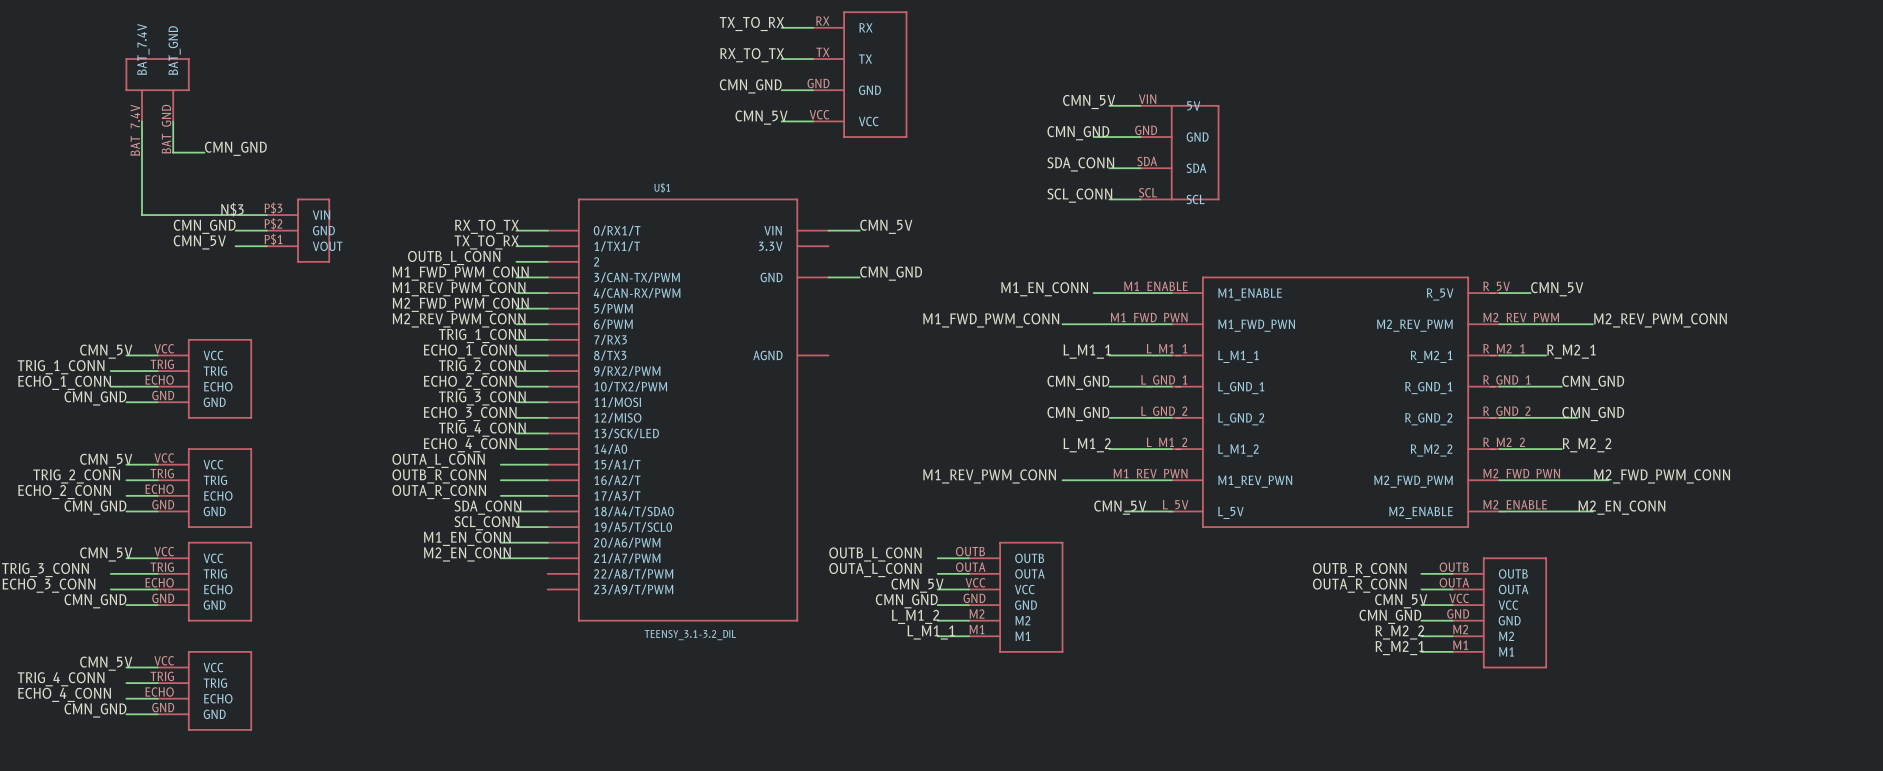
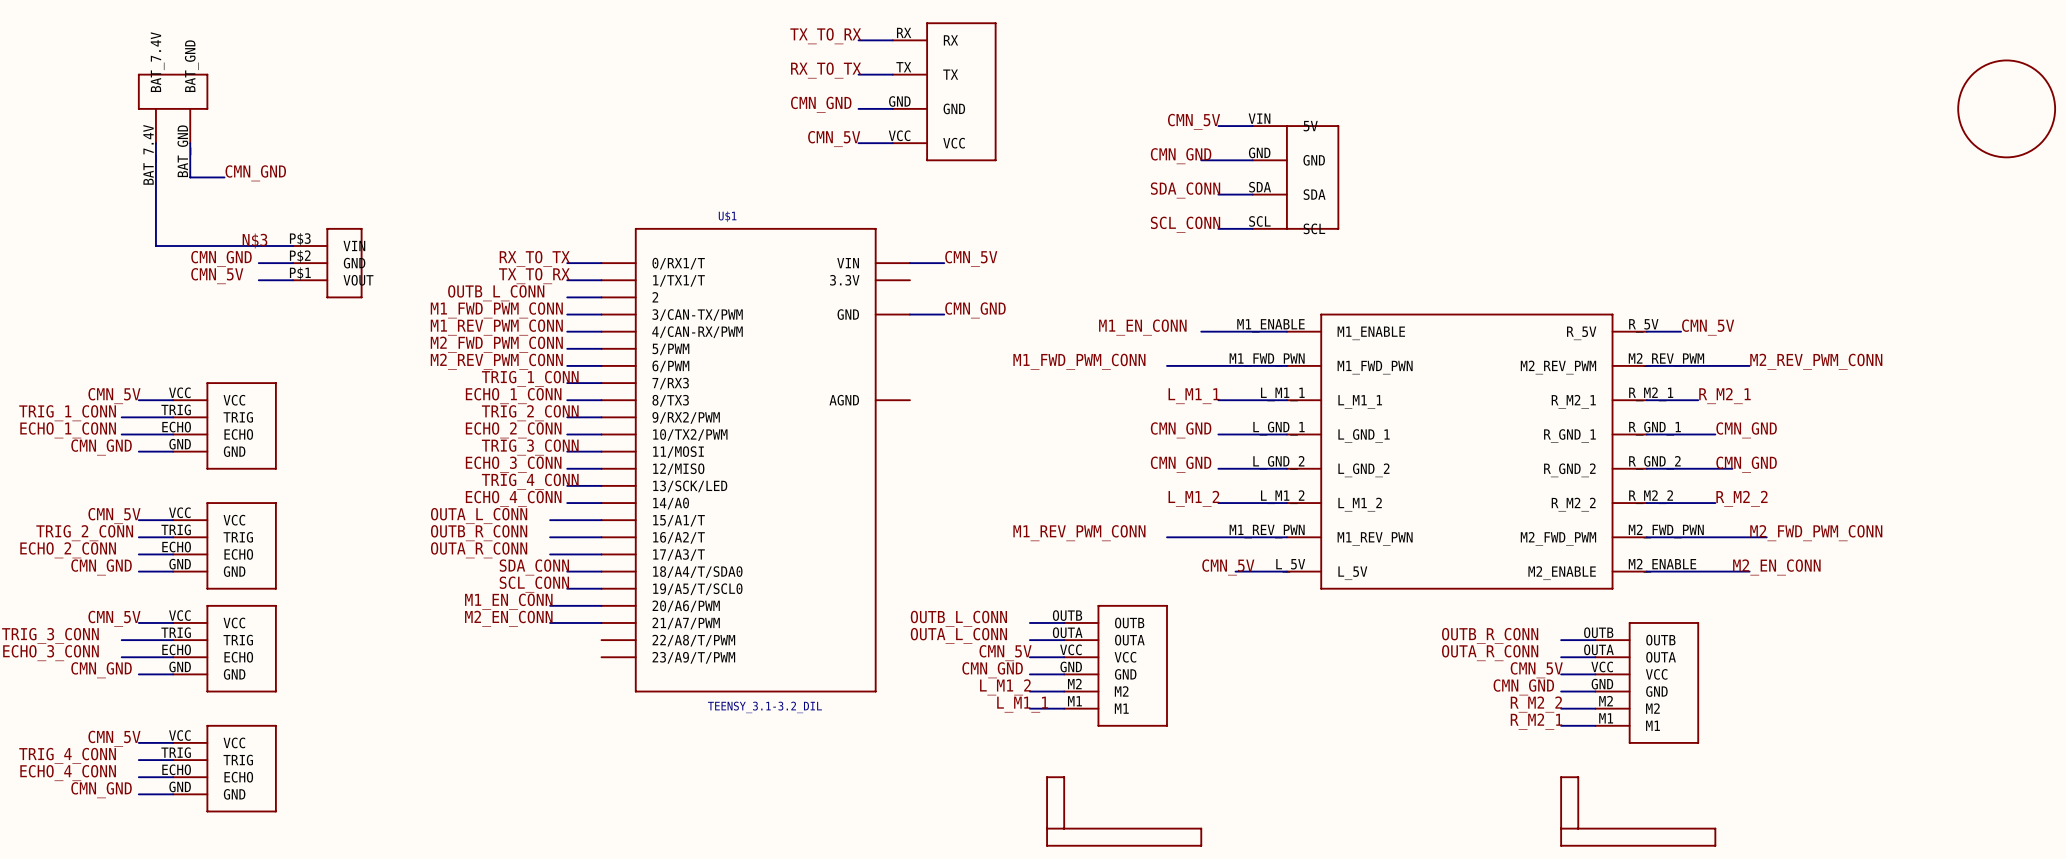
part: none -> (2006, 108)
part: none -> (1124, 811)
part: none -> (1638, 811)

